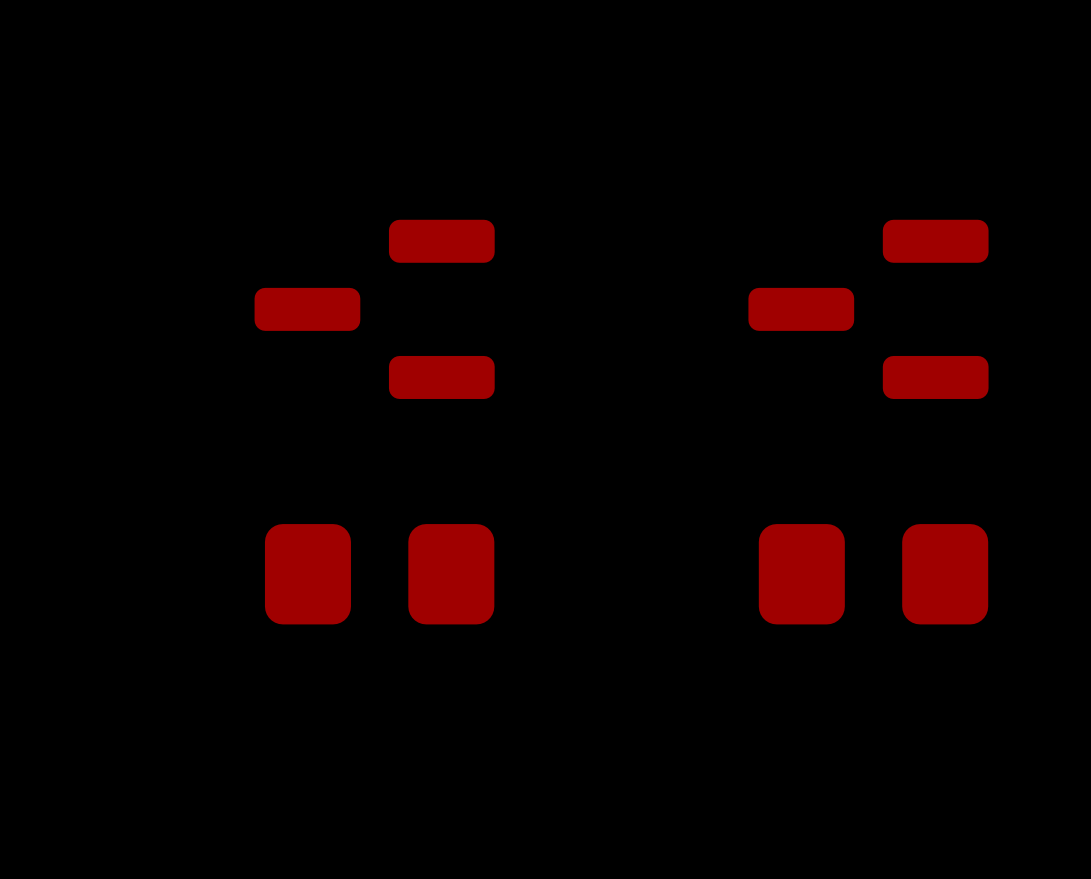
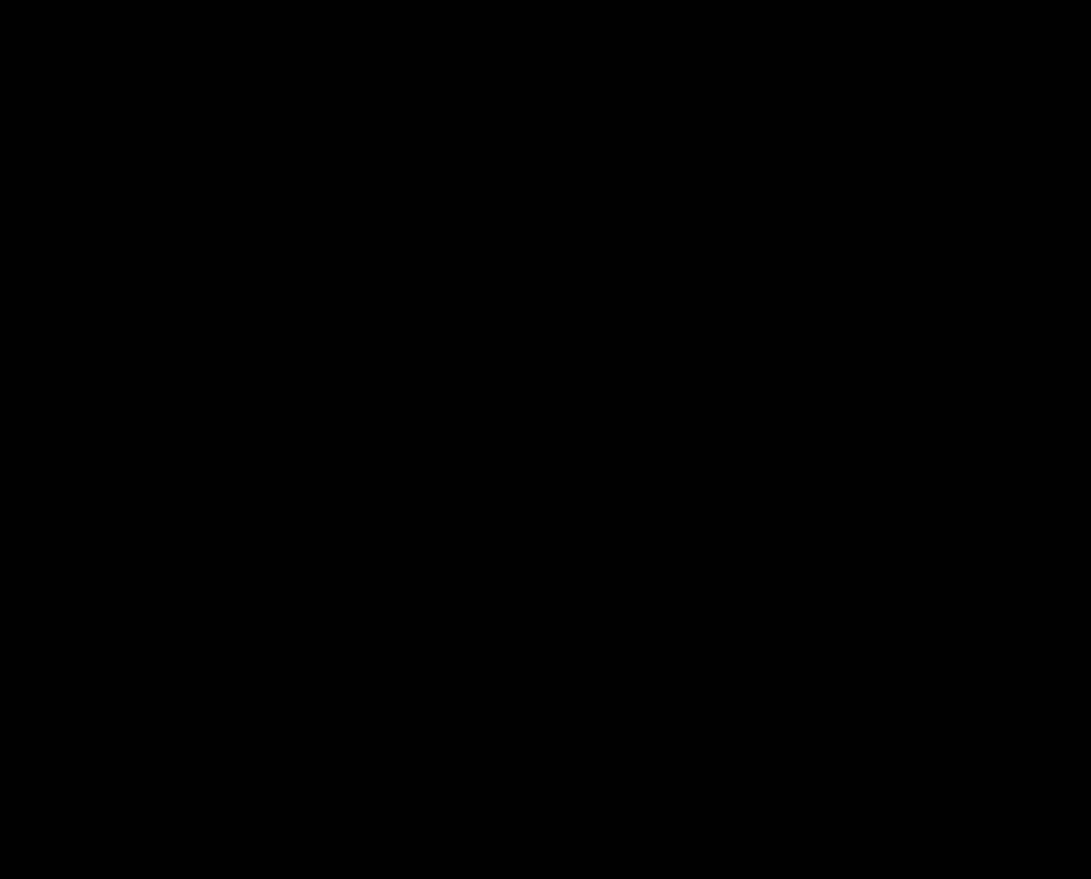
part: (374, 309) -> none
part: (868, 309) -> none
part: (379, 574) -> none
part: (873, 574) -> none

